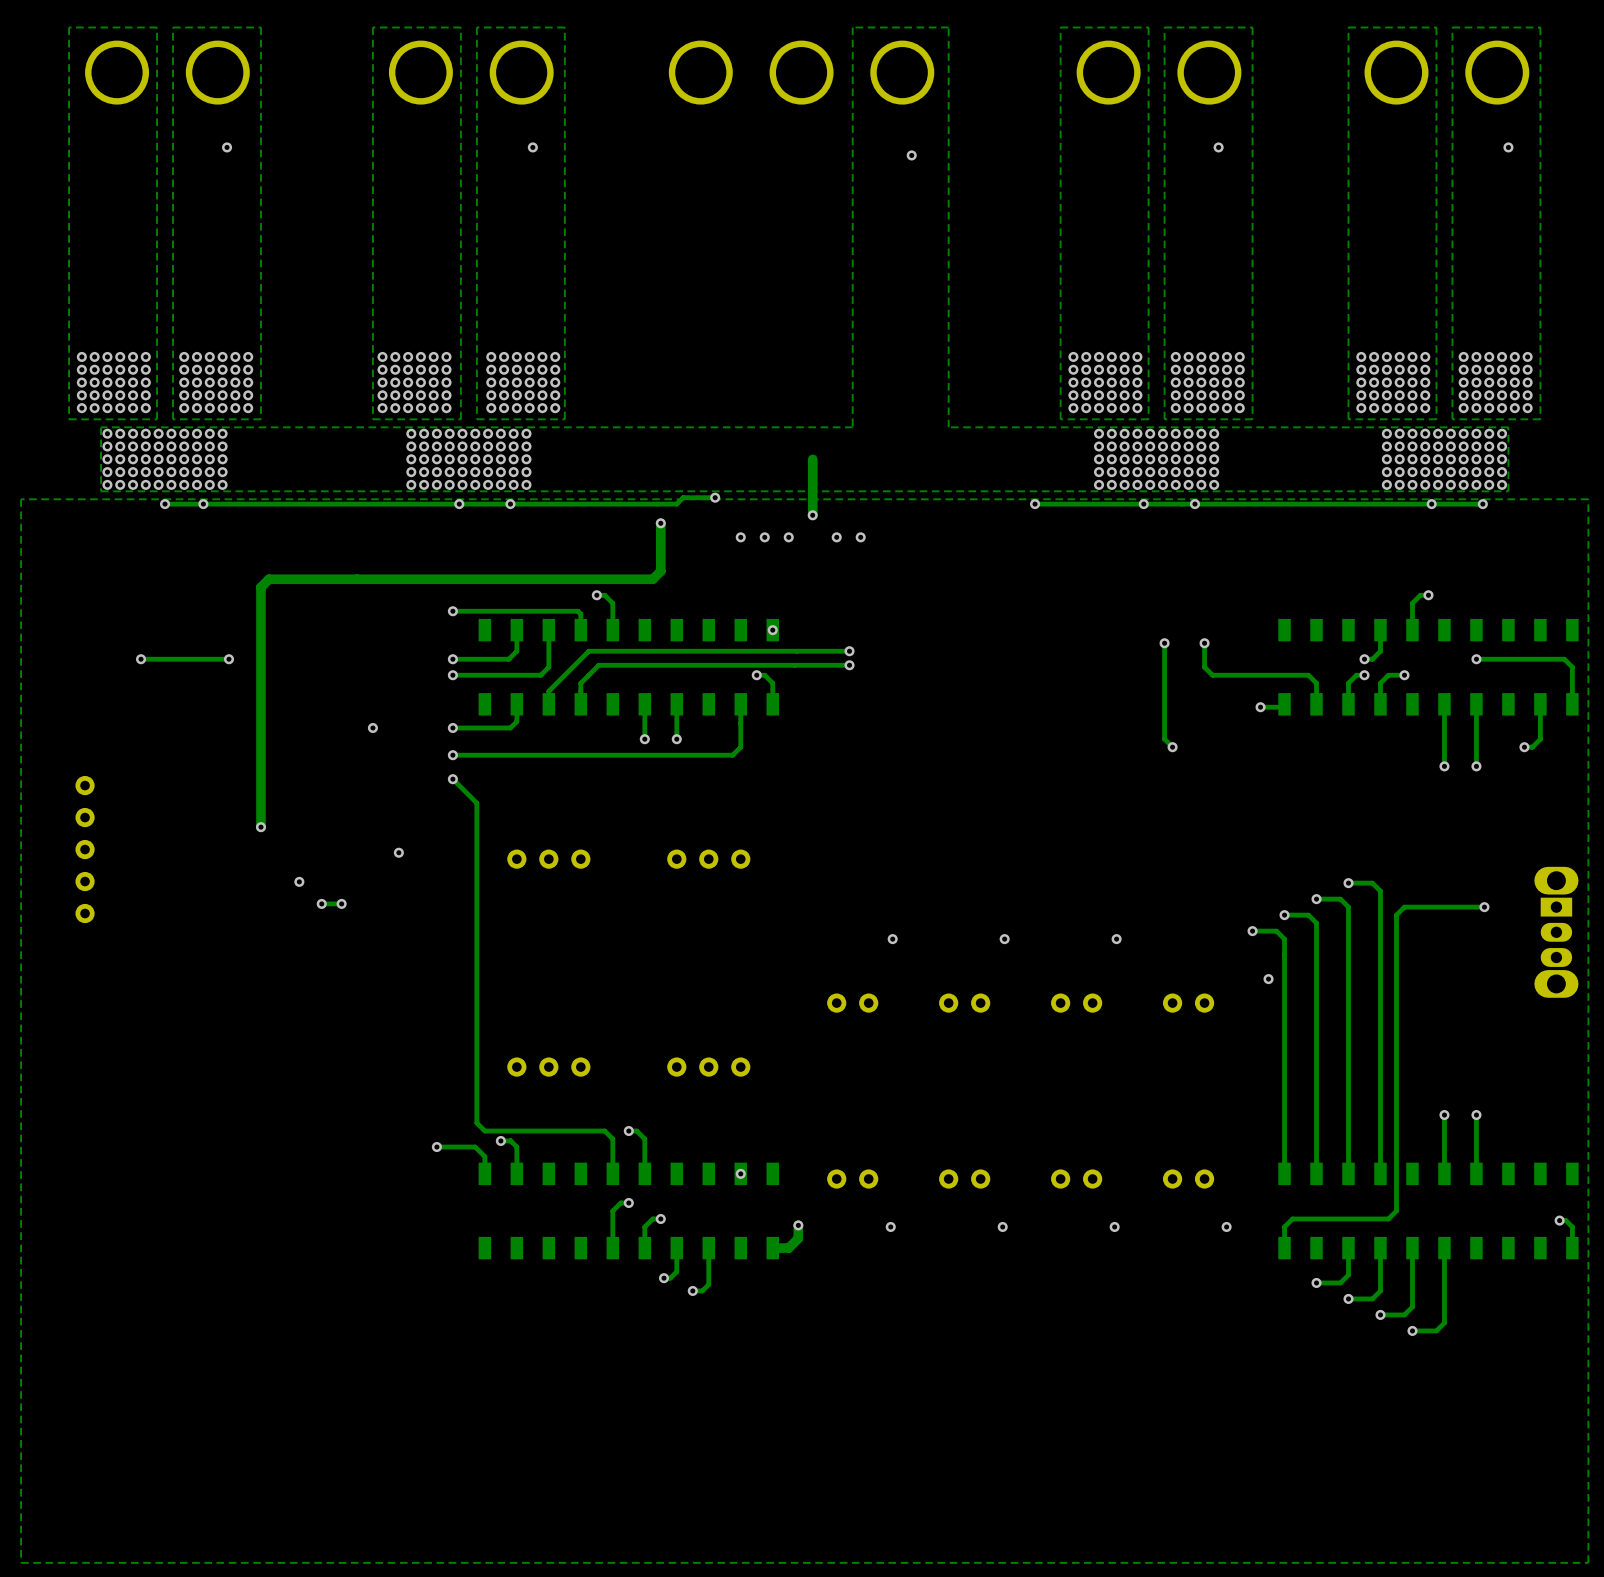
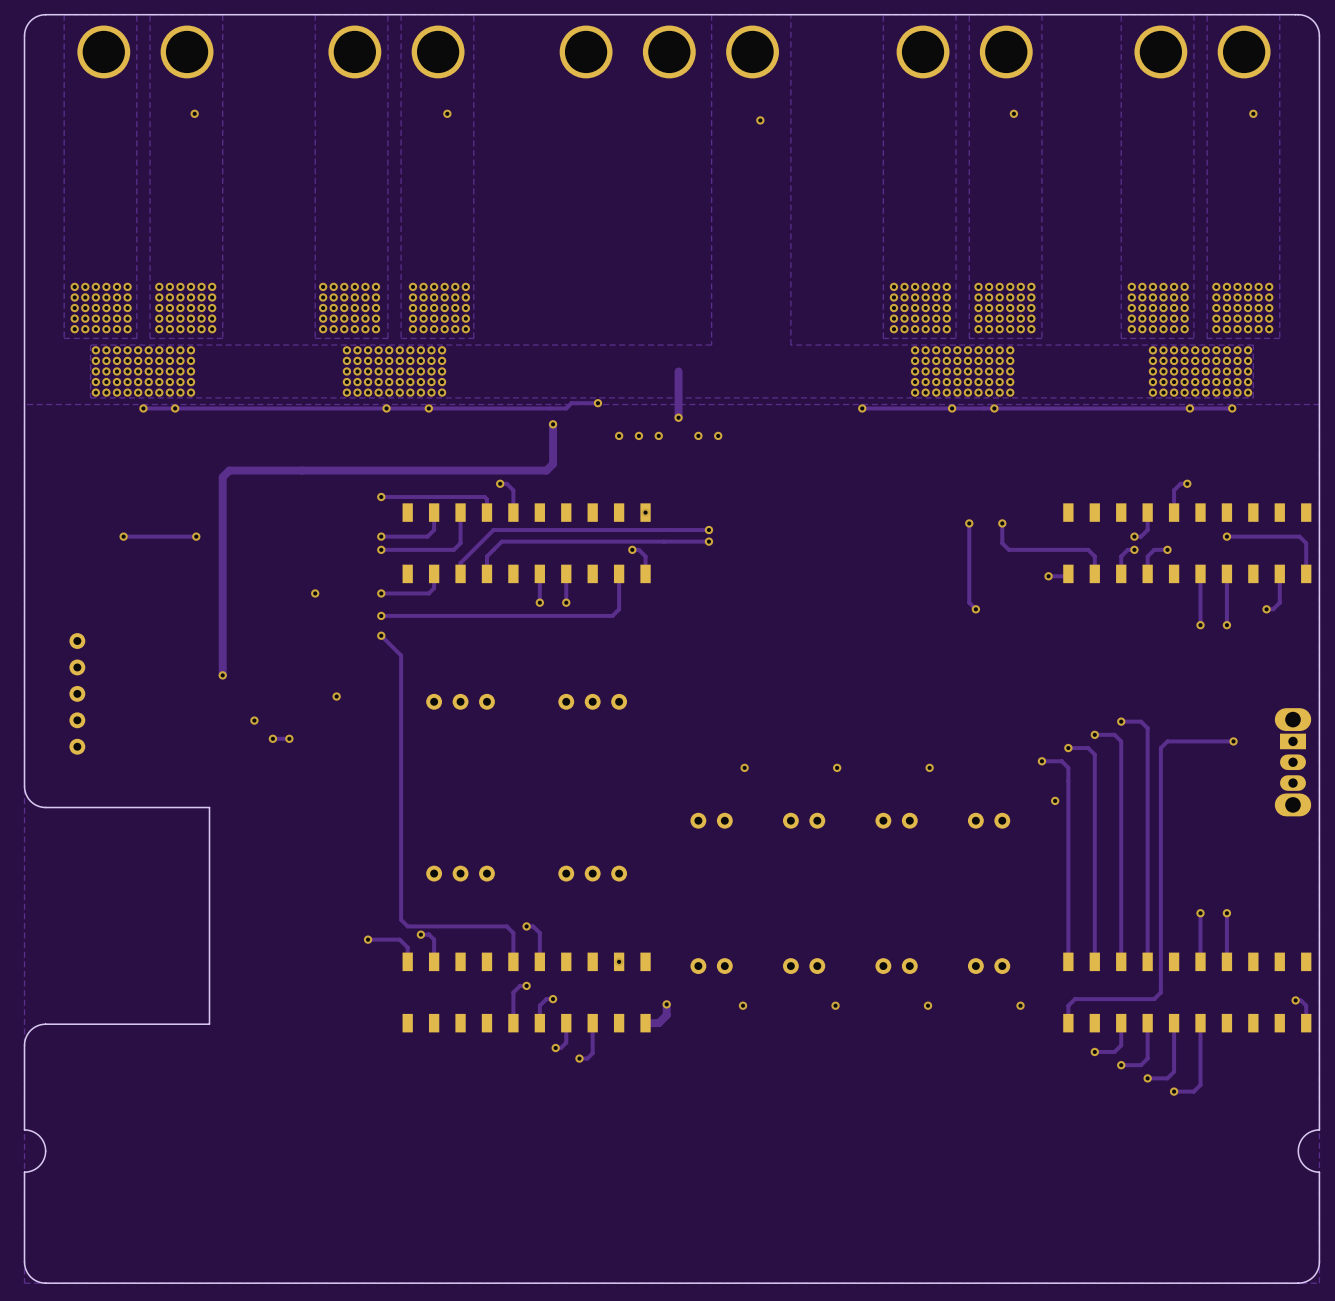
board edge: none -> (1298, 14) (45, 14) (37, 16) (30, 20) (26, 27) (24, 35) (25, 791) (32, 803) (42, 807) (209, 807) (209, 1024) (42, 1024) (32, 1028) (26, 1037) (24, 1129) (32, 1131) (39, 1136) (44, 1142) (45, 1151) (44, 1159) (39, 1166) (32, 1170) (24, 1172) (24, 1262) (26, 1270) (30, 1277) (37, 1281) (45, 1283) (1298, 1283) (1306, 1281) (1313, 1277) (1317, 1270) (1319, 1262) (1319, 1172) (1311, 1170) (1304, 1166) (1299, 1159) (1298, 1151) (1299, 1142) (1304, 1136) (1311, 1131) (1319, 1129) (1319, 35) (1317, 27) (1313, 20) (1306, 16) (1298, 14)

